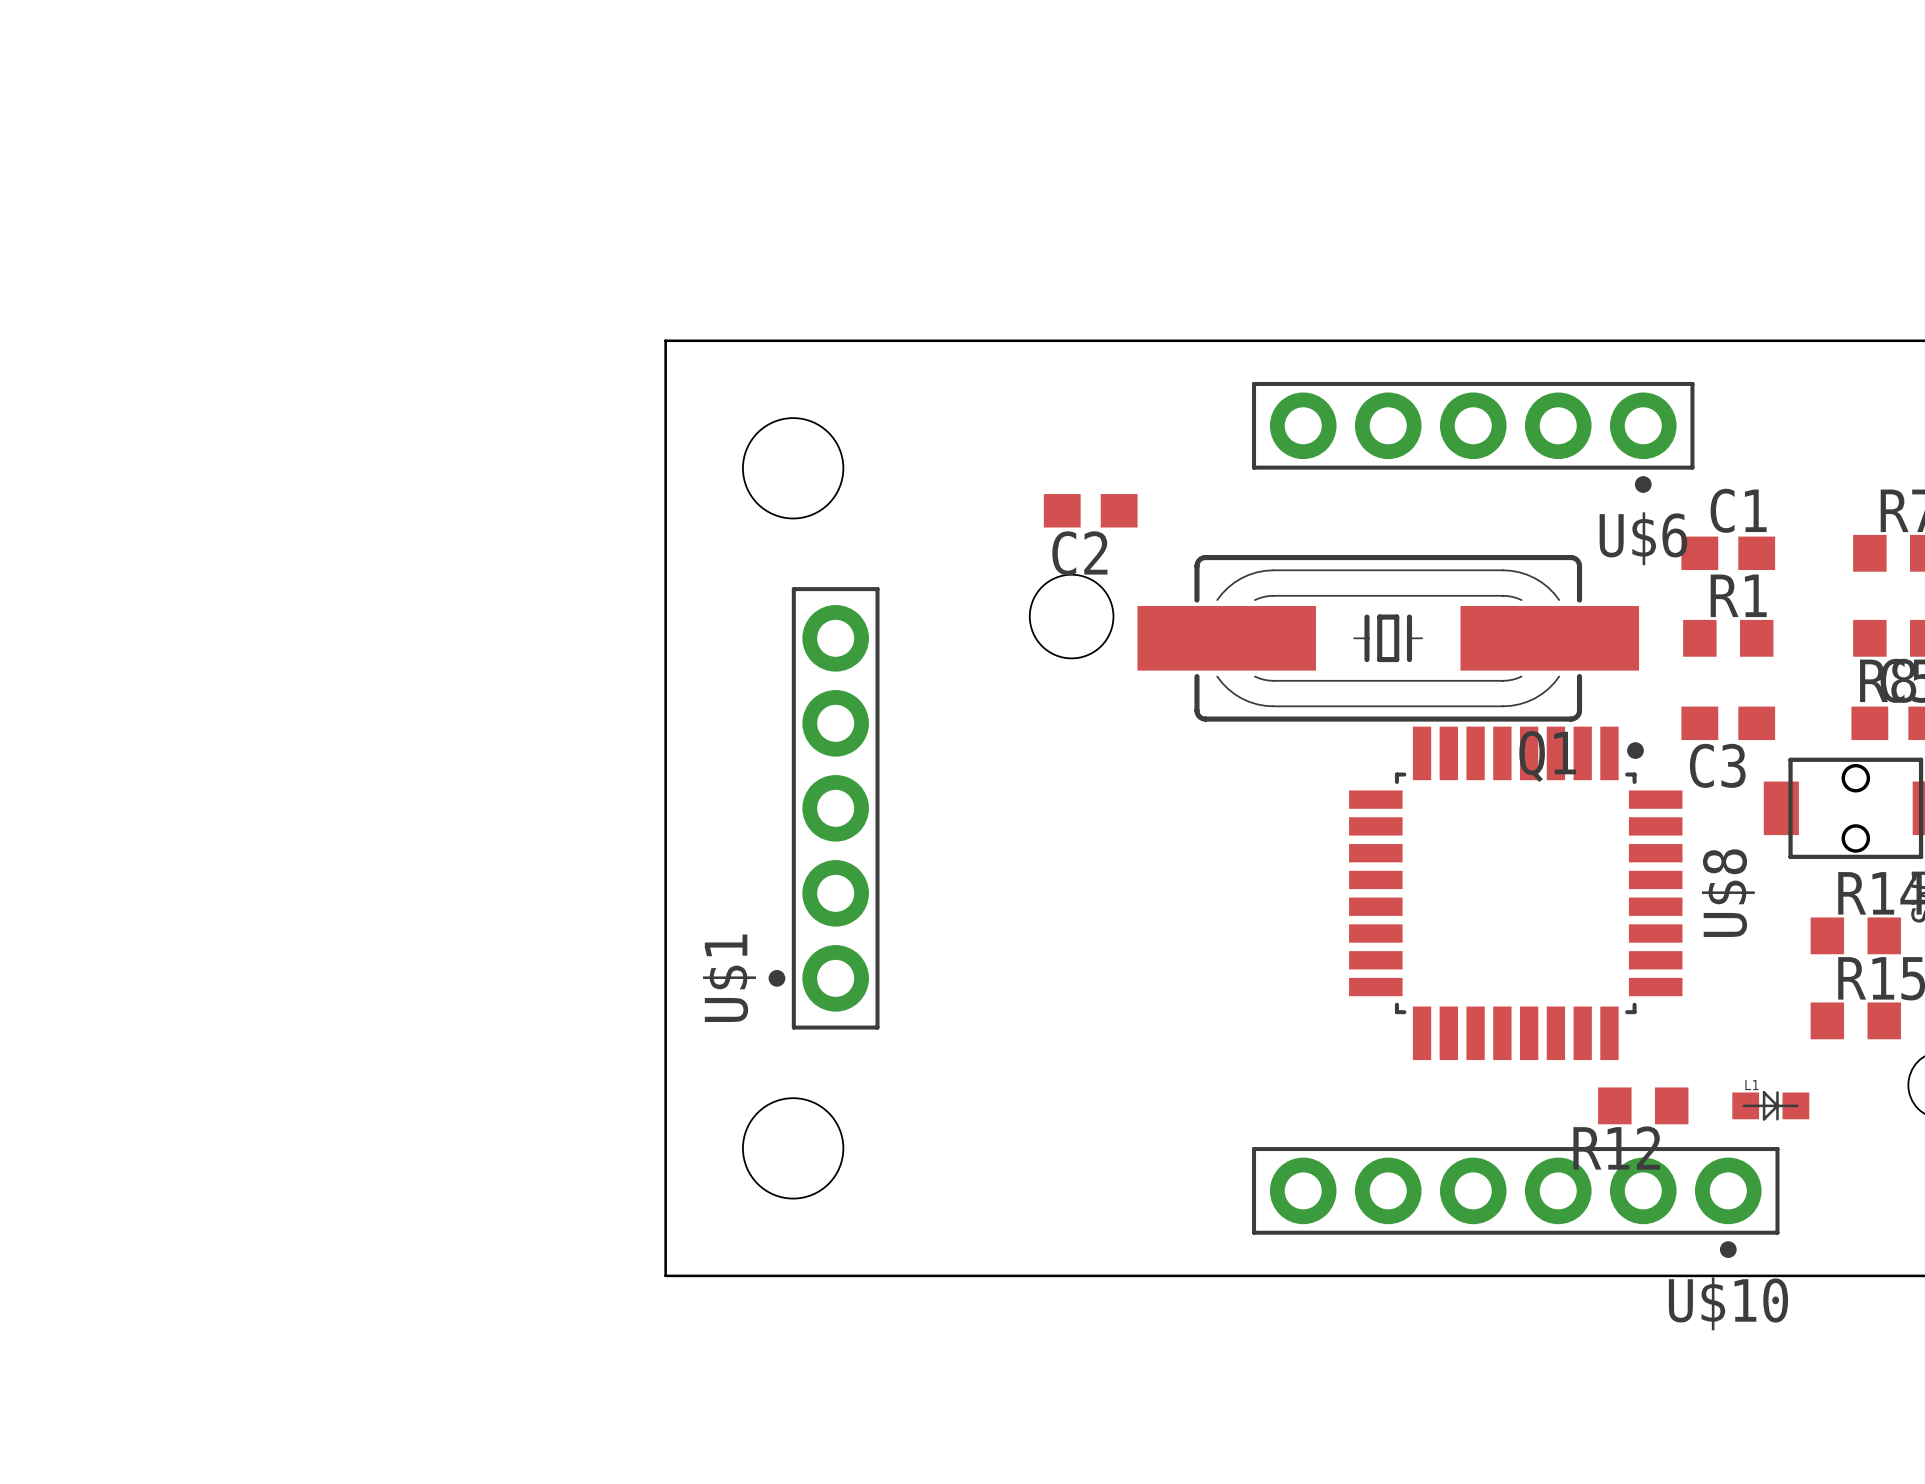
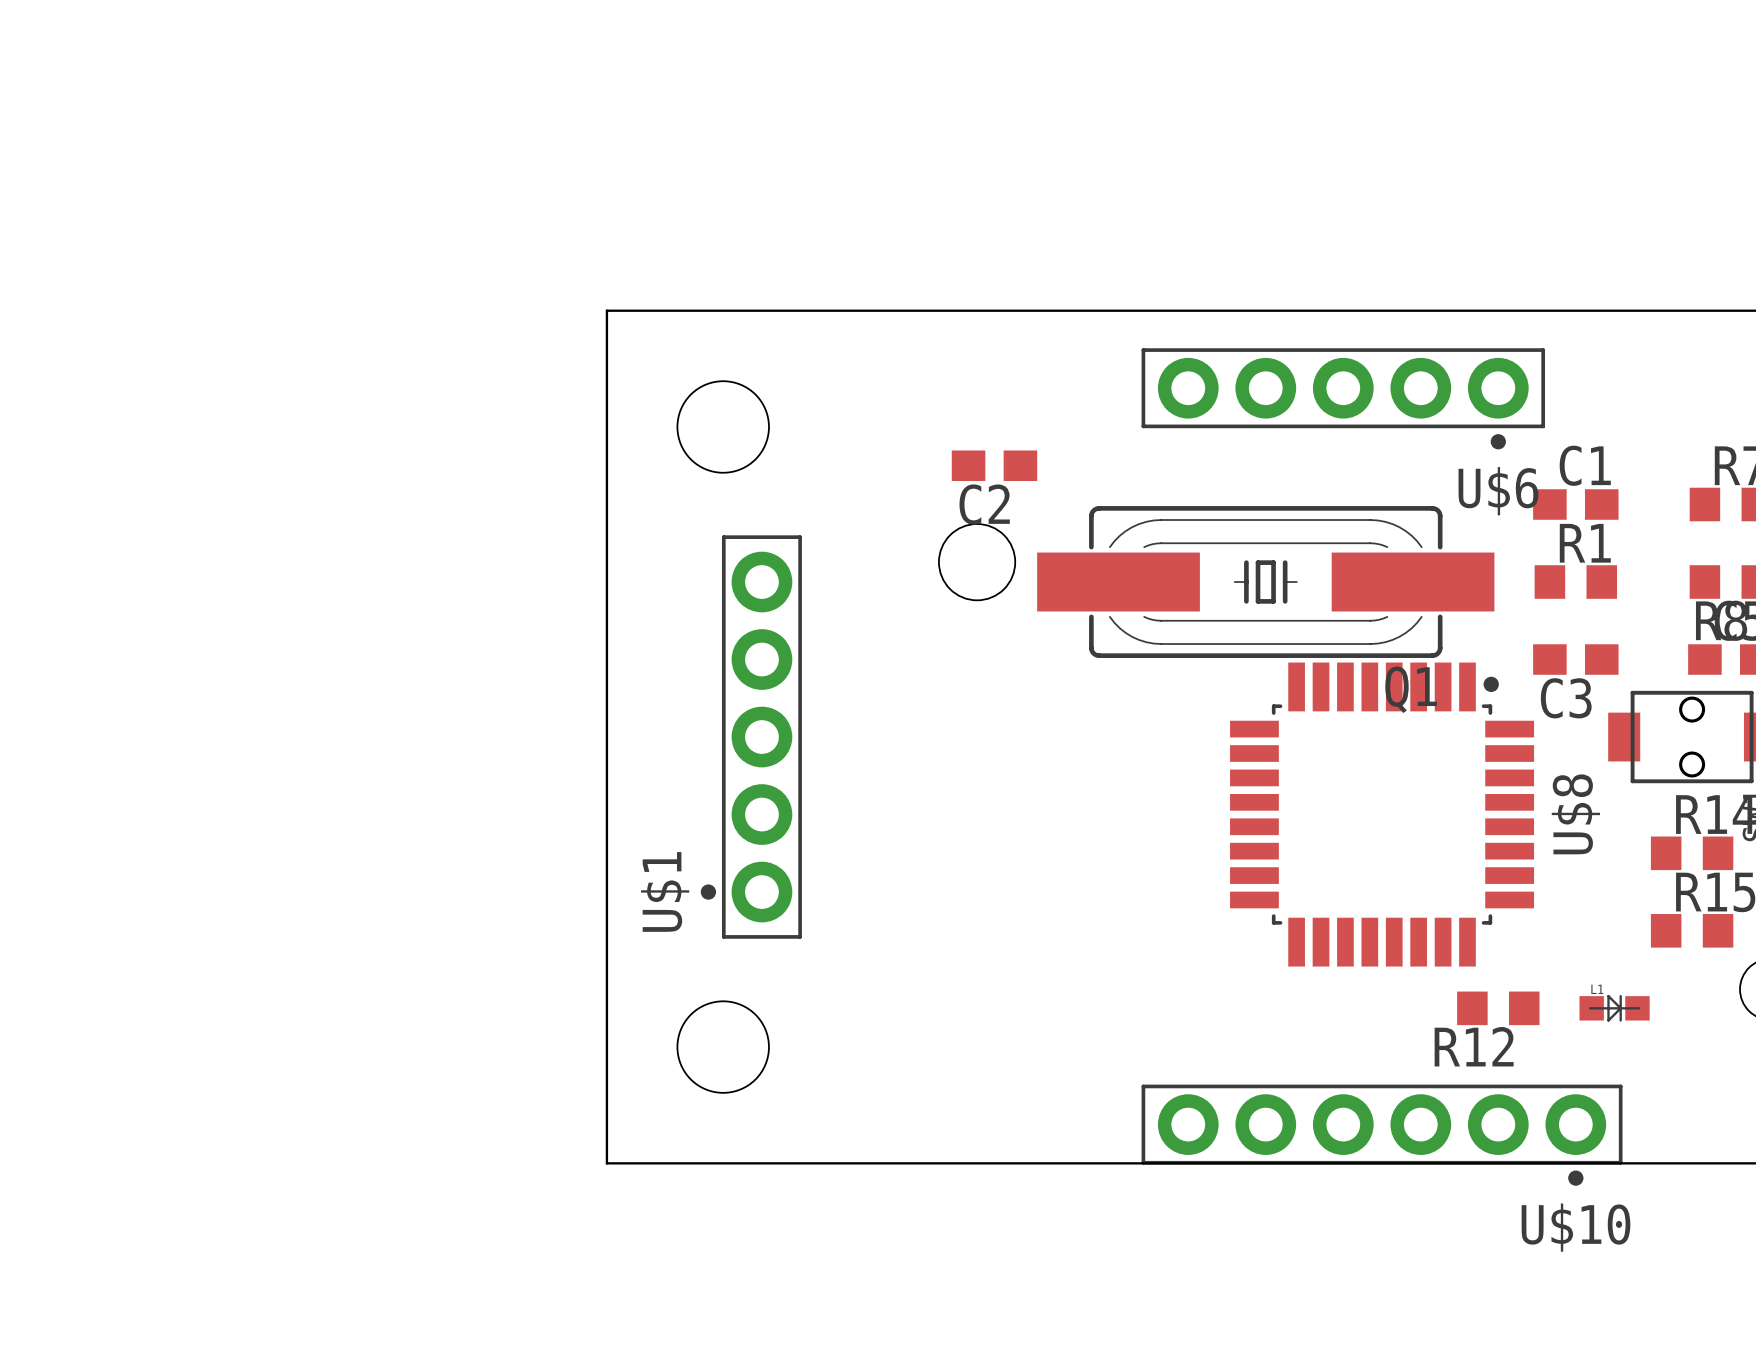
U$10 position: (1515, 1202) -> (1382, 1135)

